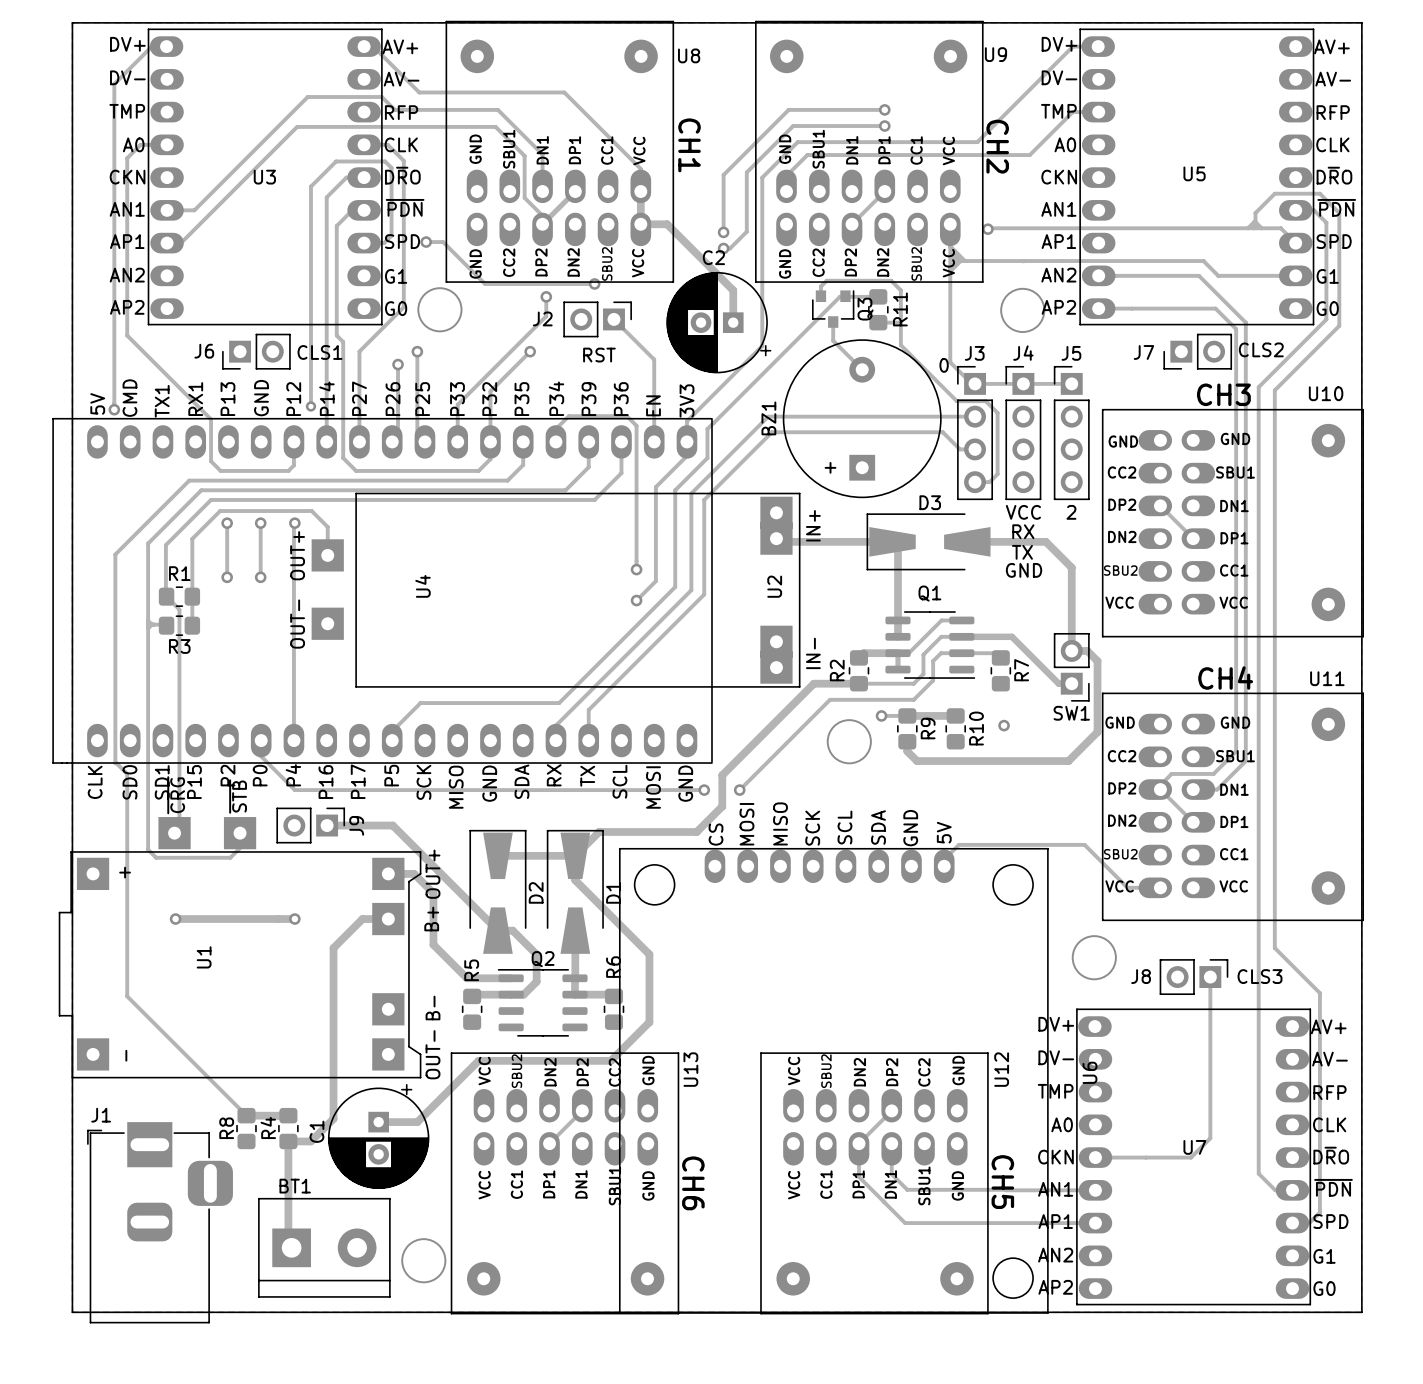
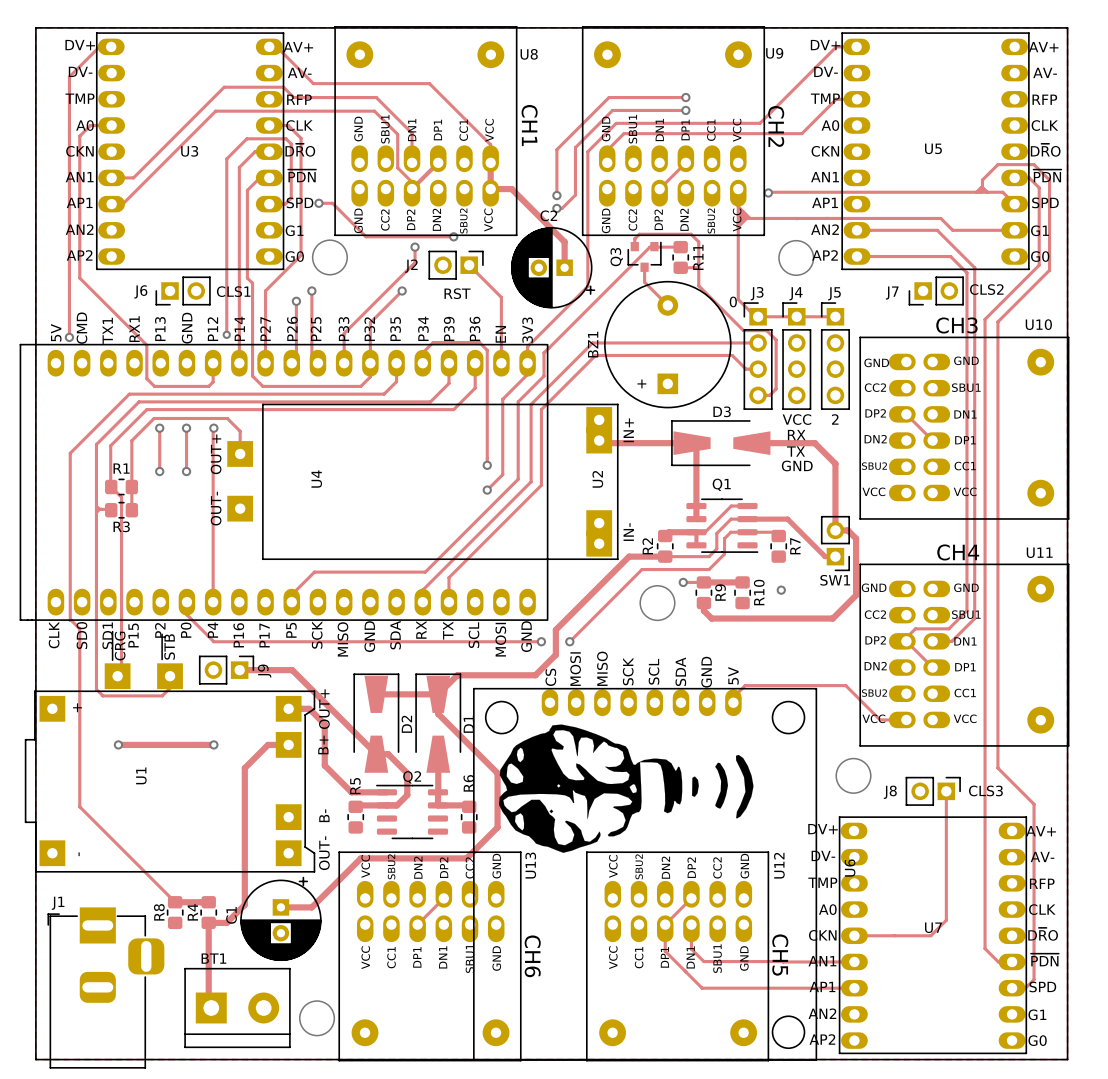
Q3 name position: Q3 (865, 309) -> Q3 (616, 257)
drawing: none -> [498, 724, 754, 853]

